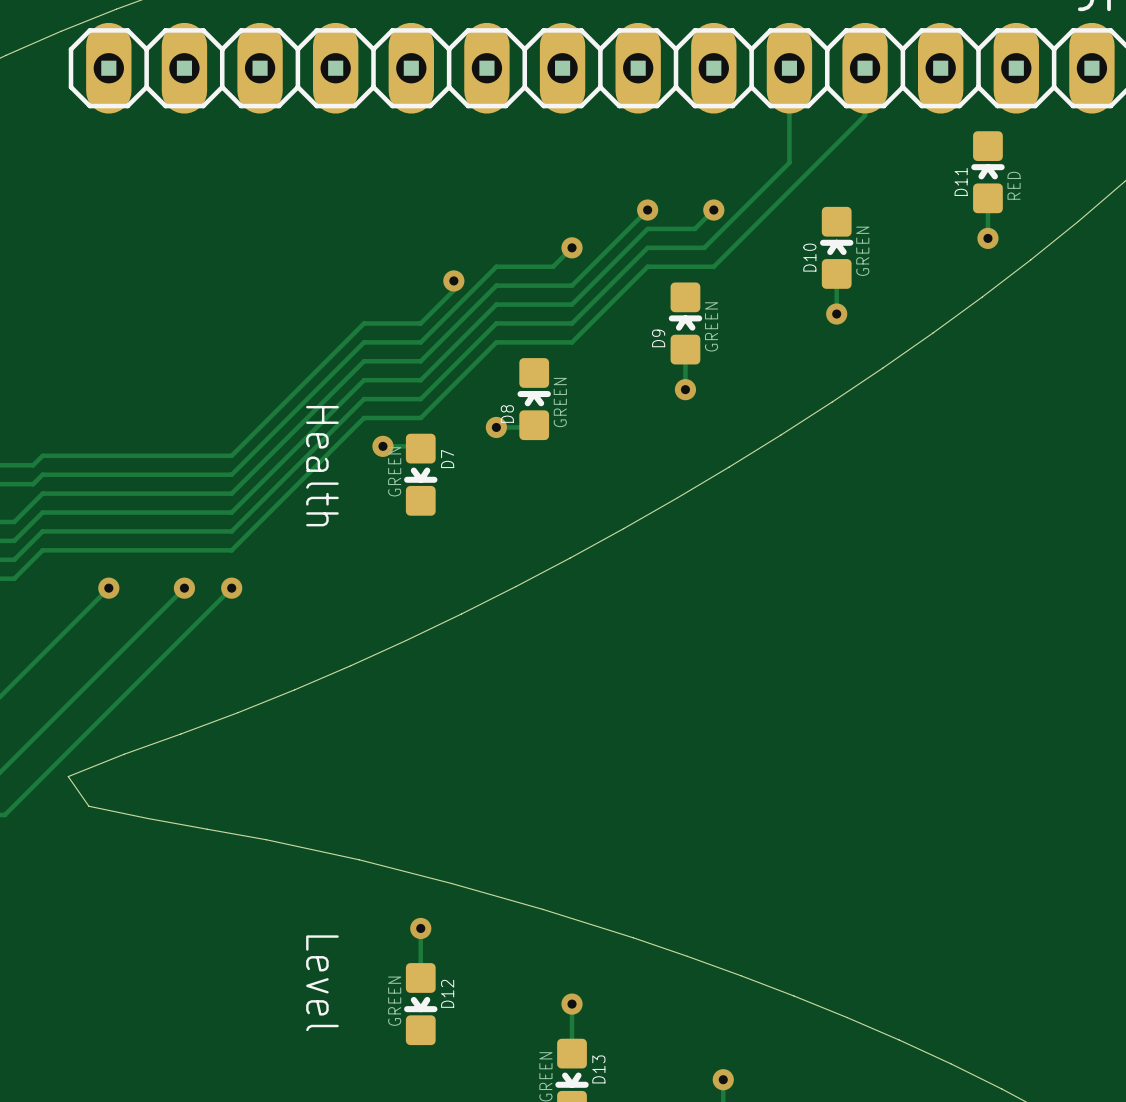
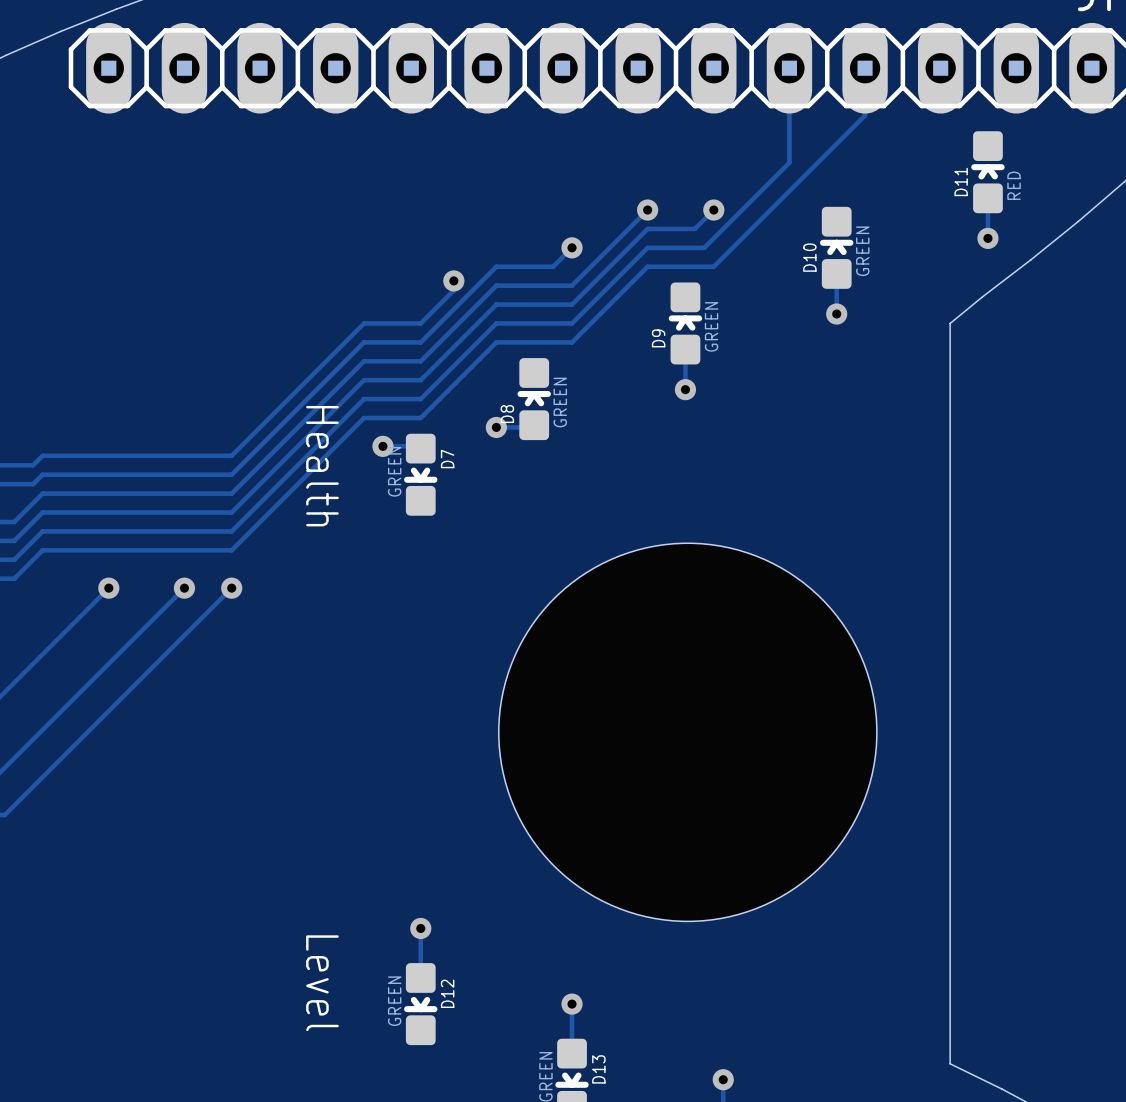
board edge: (982, 296) (883, 367) (780, 435) (623, 528) (516, 586) (406, 640) (294, 689) (68, 776) (88, 806) (266, 839) (359, 859) (542, 909) (633, 937) (740, 975) (846, 1017) (950, 1063) (1001, 1089) -> (982, 296) (950, 323) (950, 1063) (1001, 1089)
hole: none -> (687, 732)

